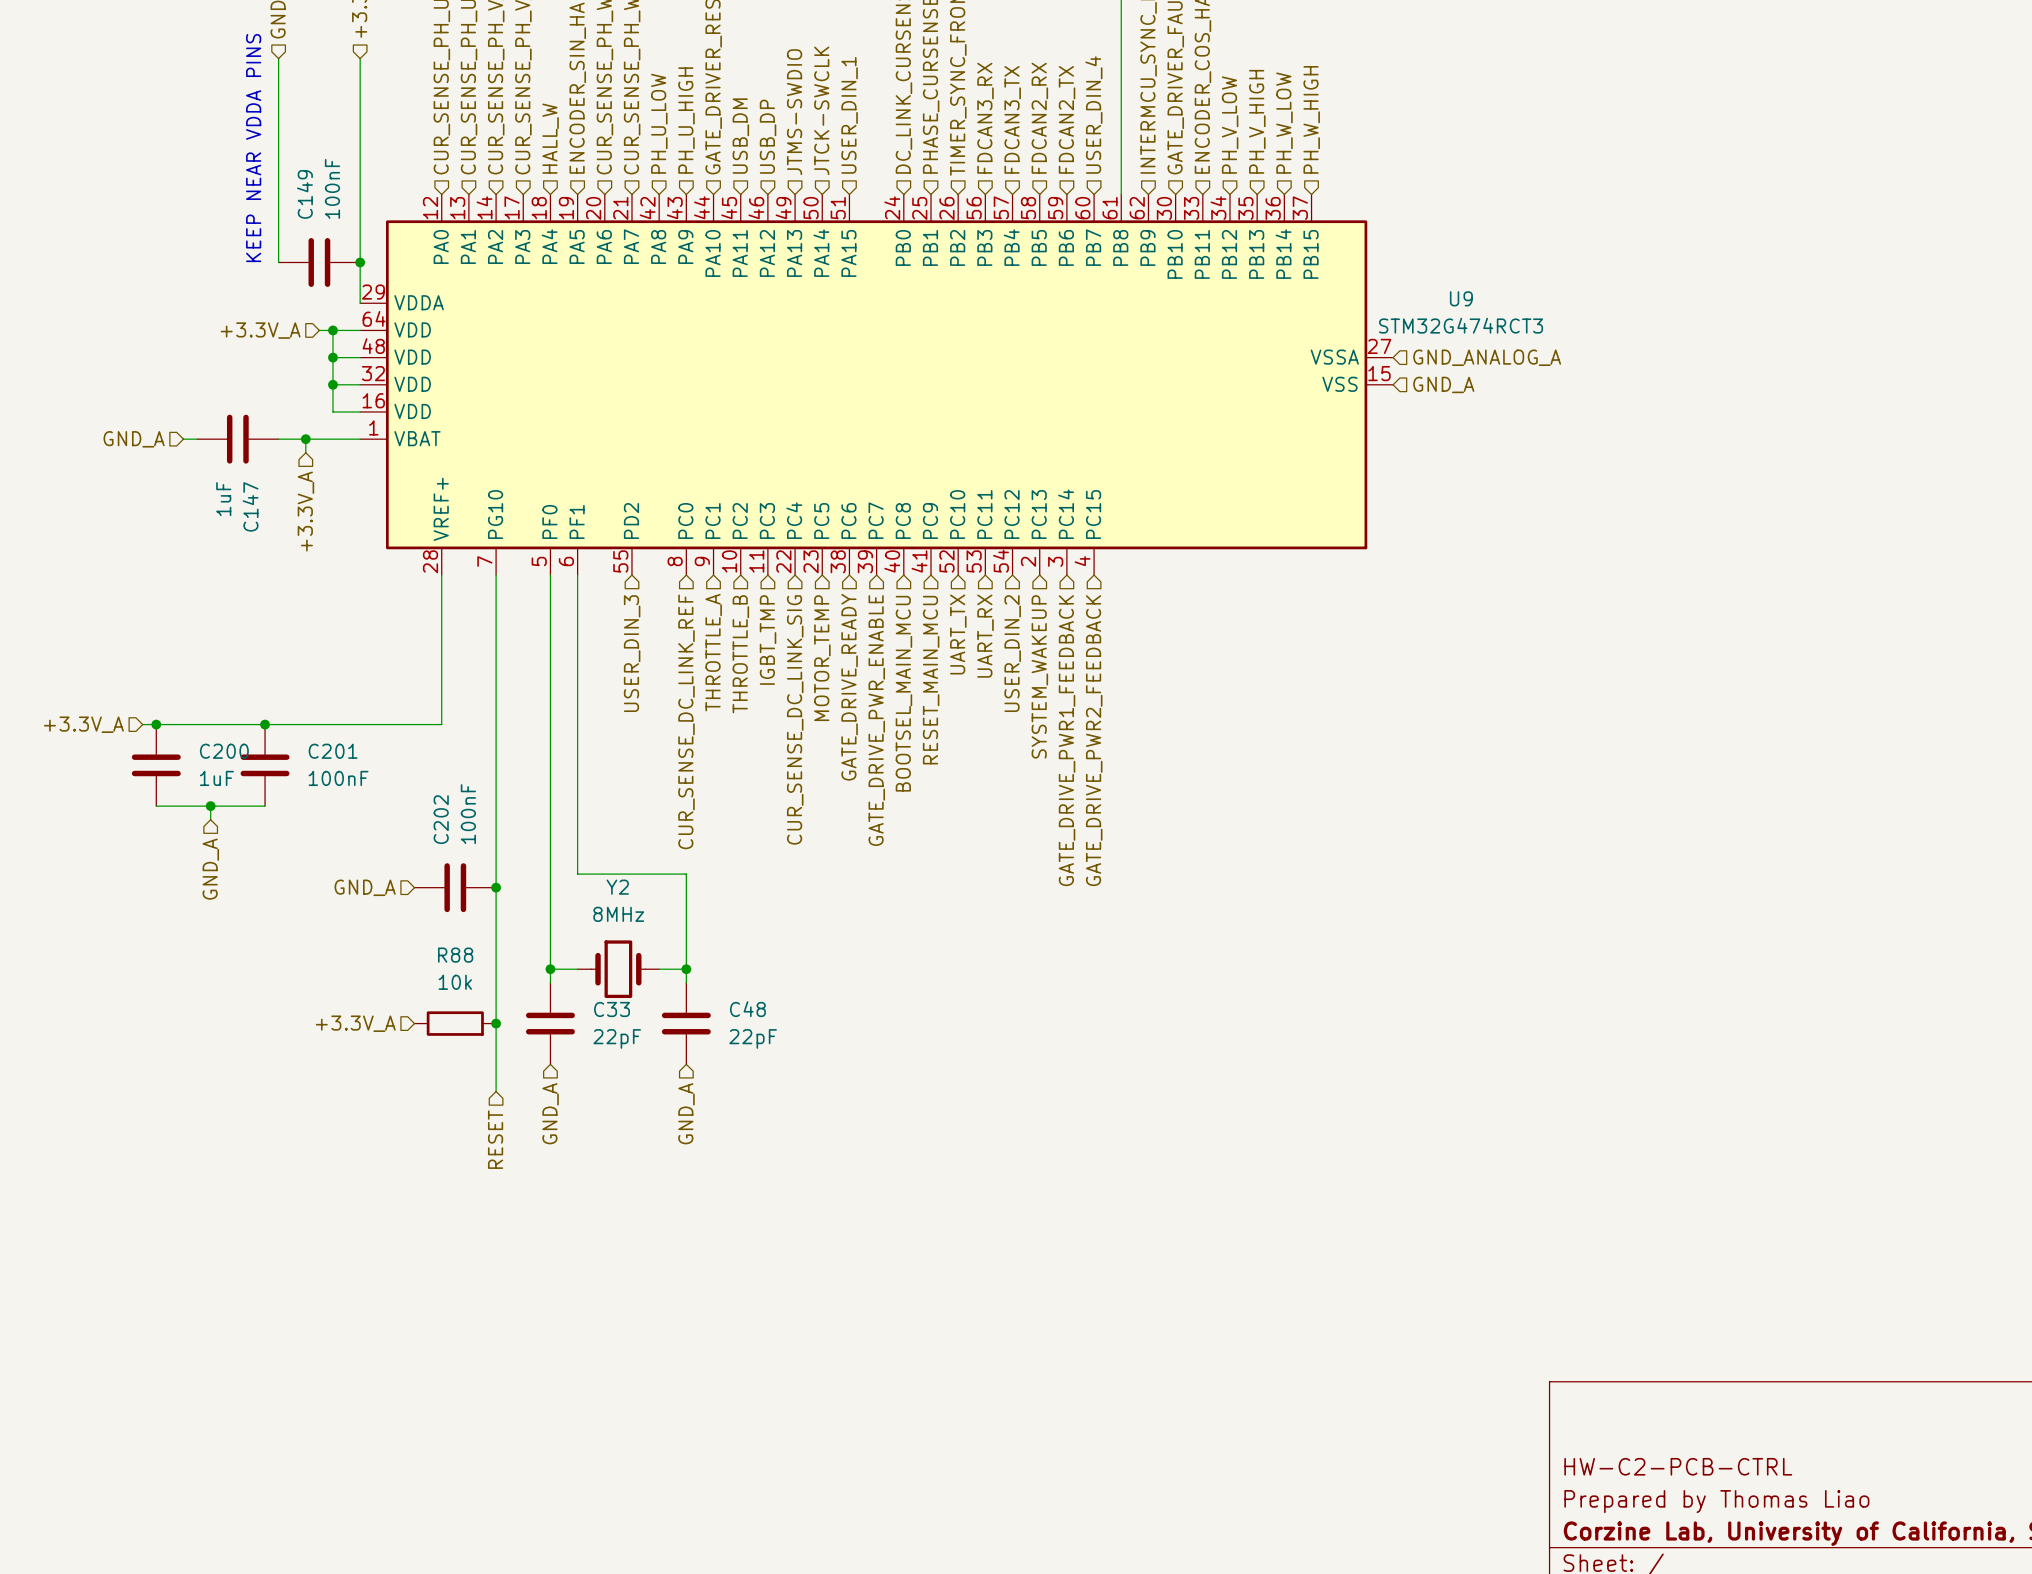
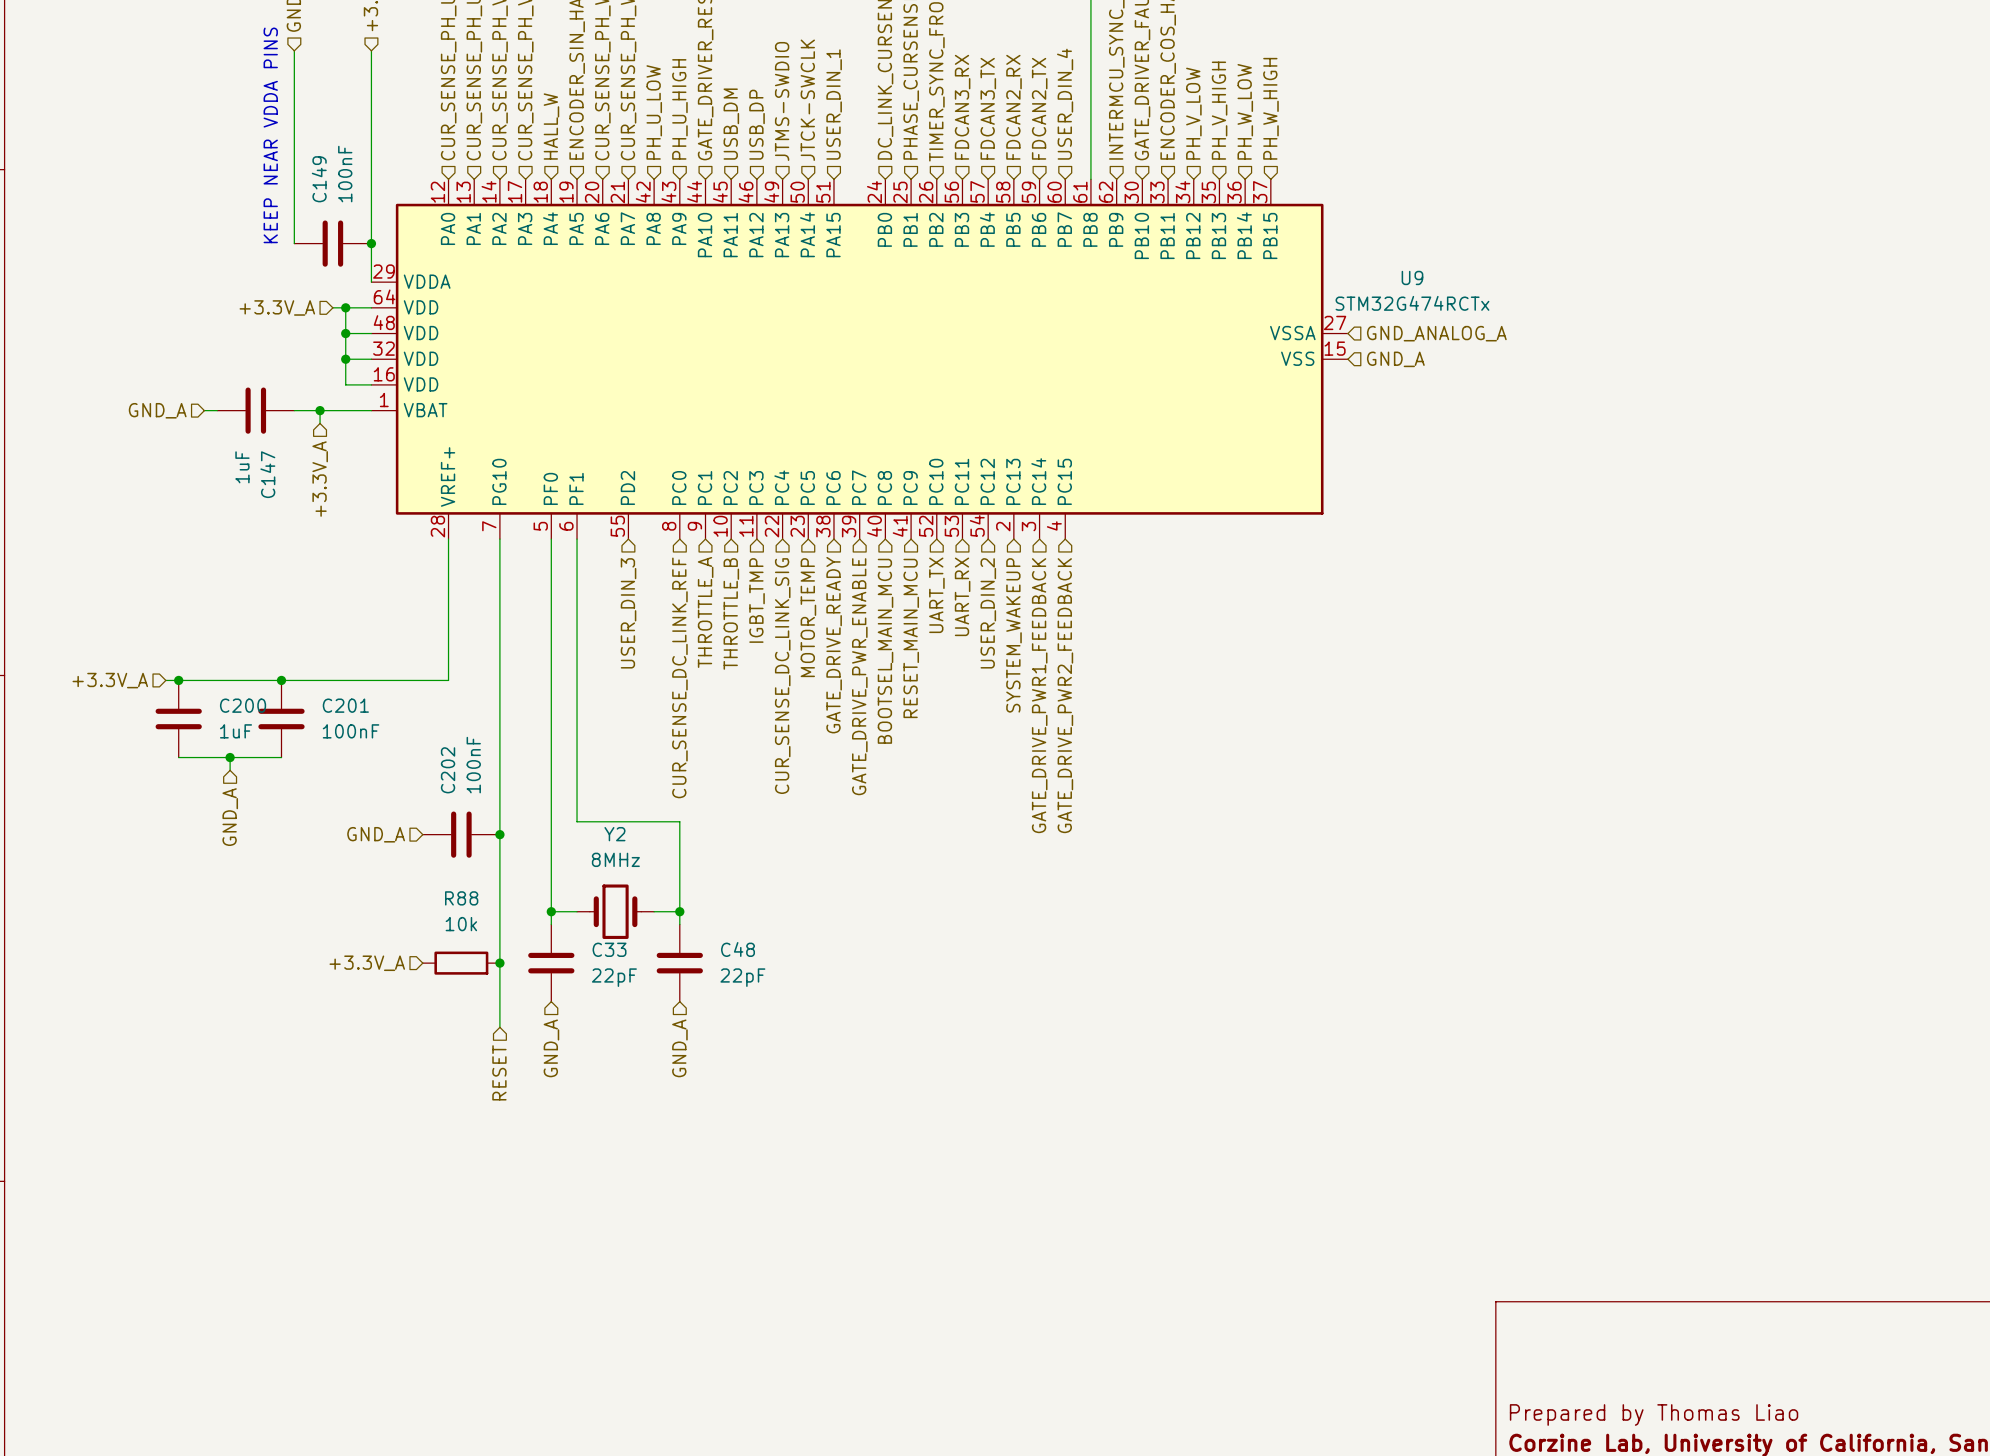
U9 value: STM32G474RCT3 (1461, 325) -> STM32G474RCTx (1412, 303)
title block: HW-C2-PCB-CTRL (1678, 1466) -> none

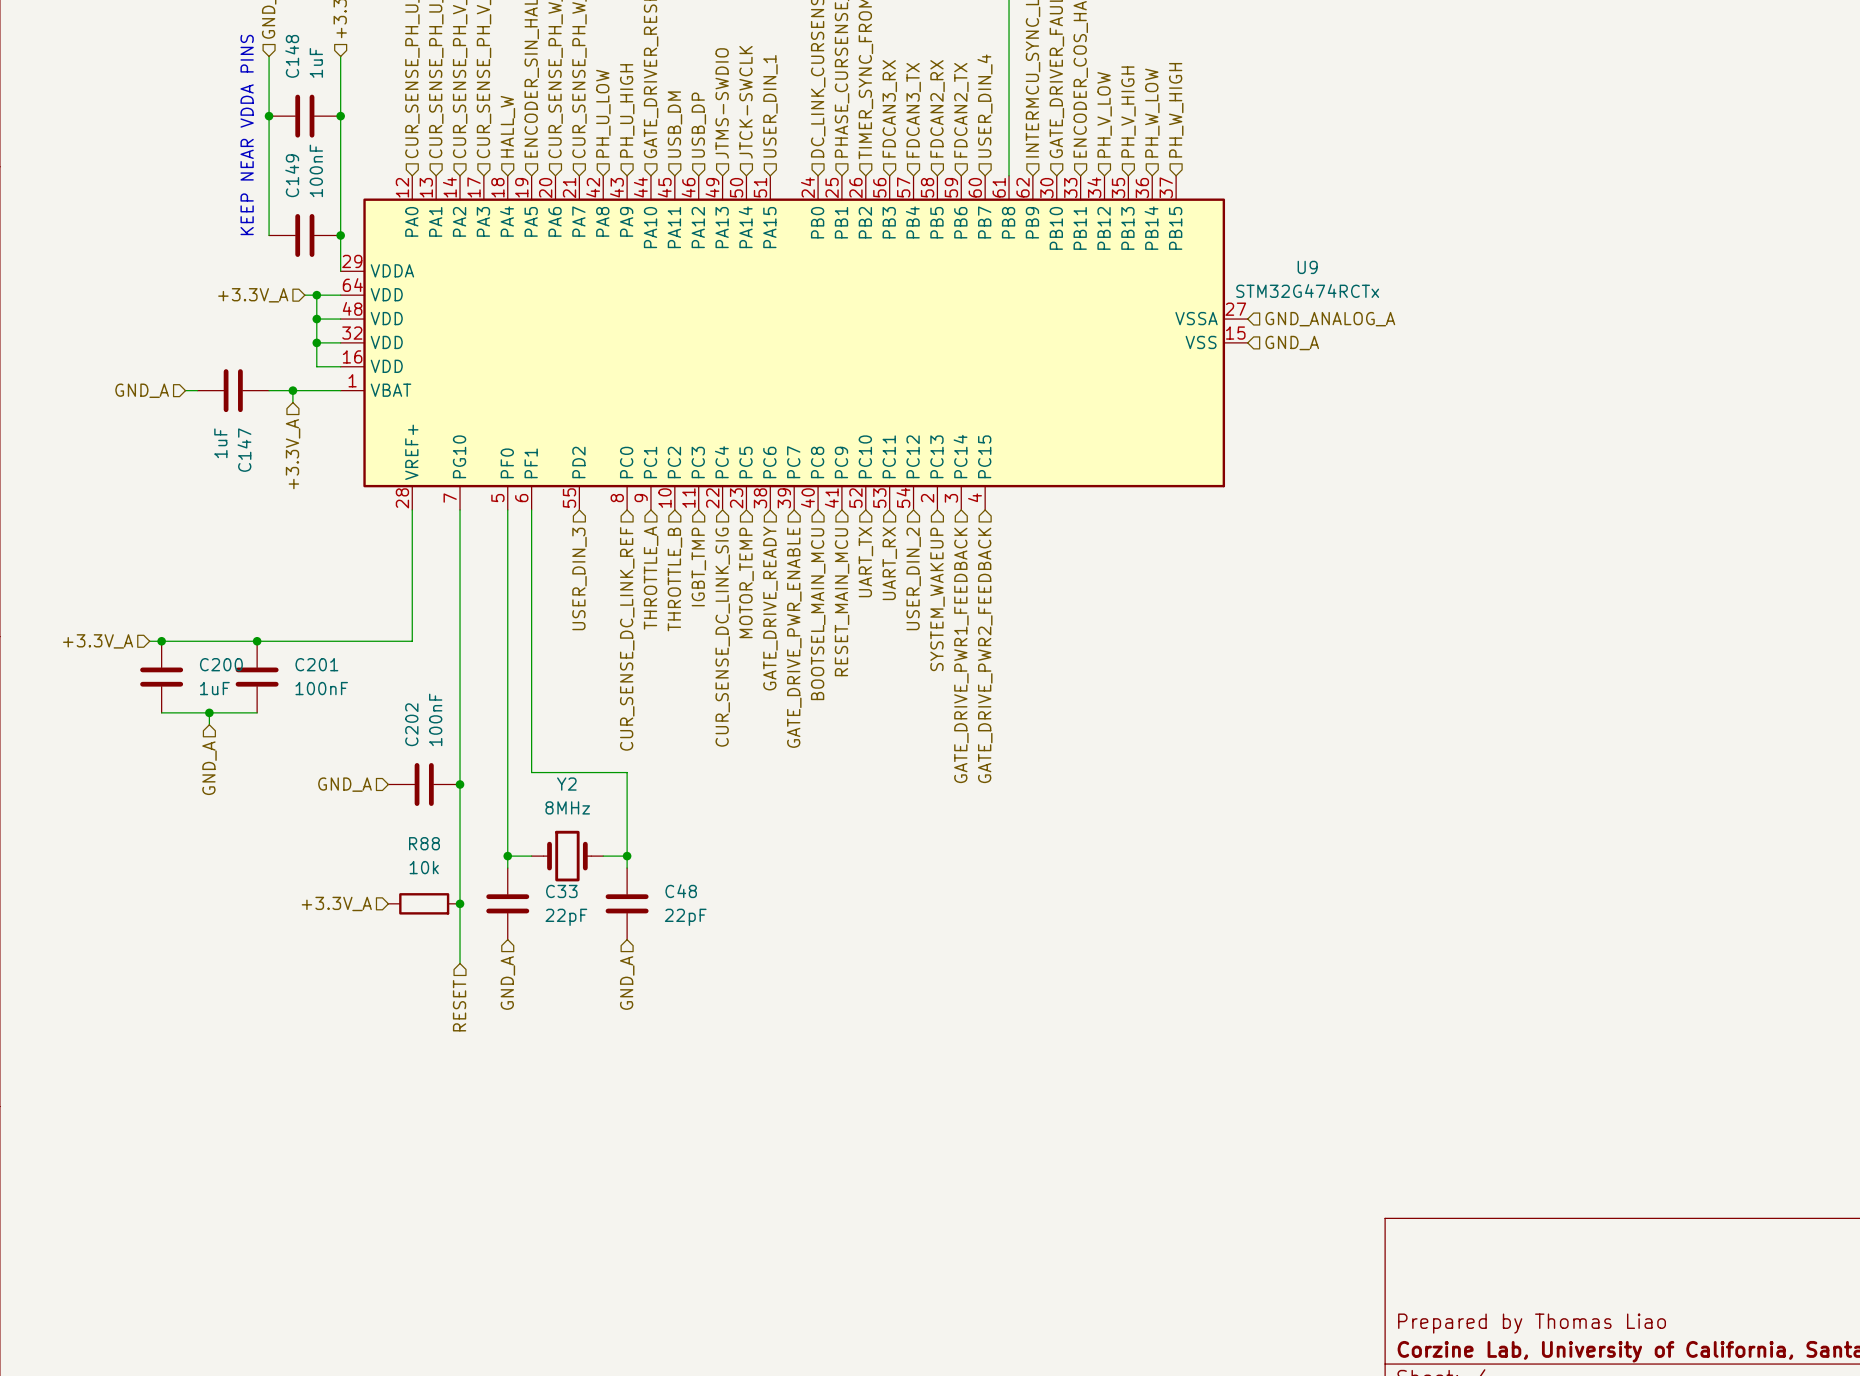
junction: none -> (269, 116)
C148: none -> 1uF (304, 116)
junction: none -> (340, 116)

